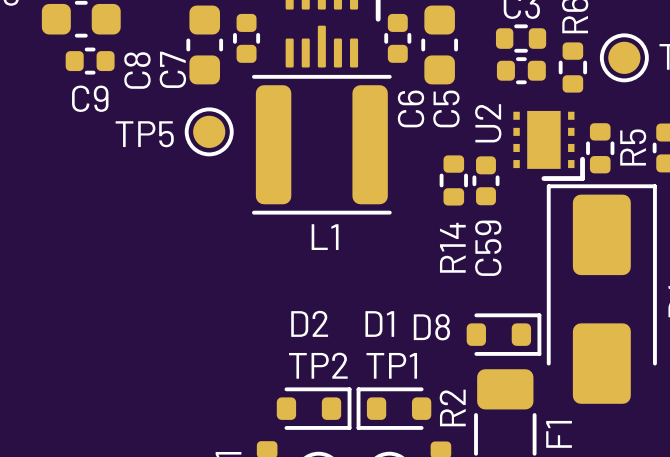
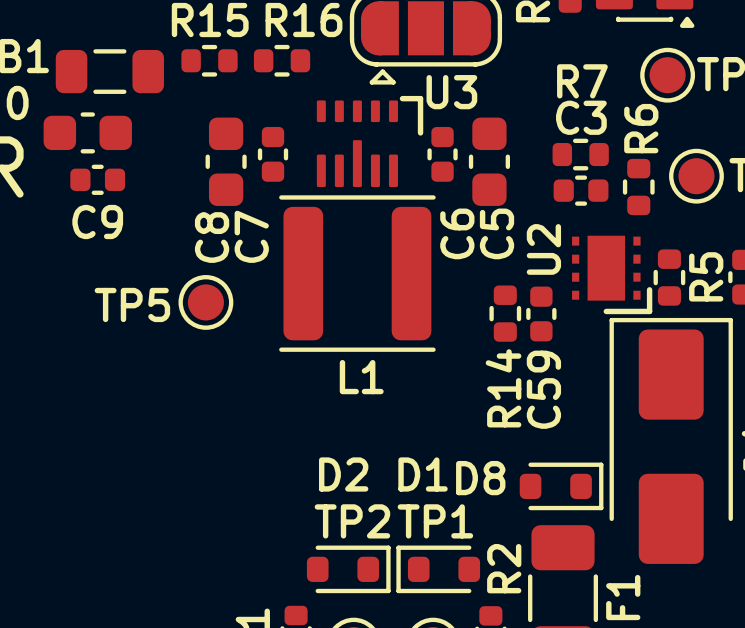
C7 name position: C7 (172, 69) -> C7 (251, 236)
C8 name position: C8 (137, 70) -> C8 (212, 237)
TP5 position: (209, 131) -> (205, 302)

